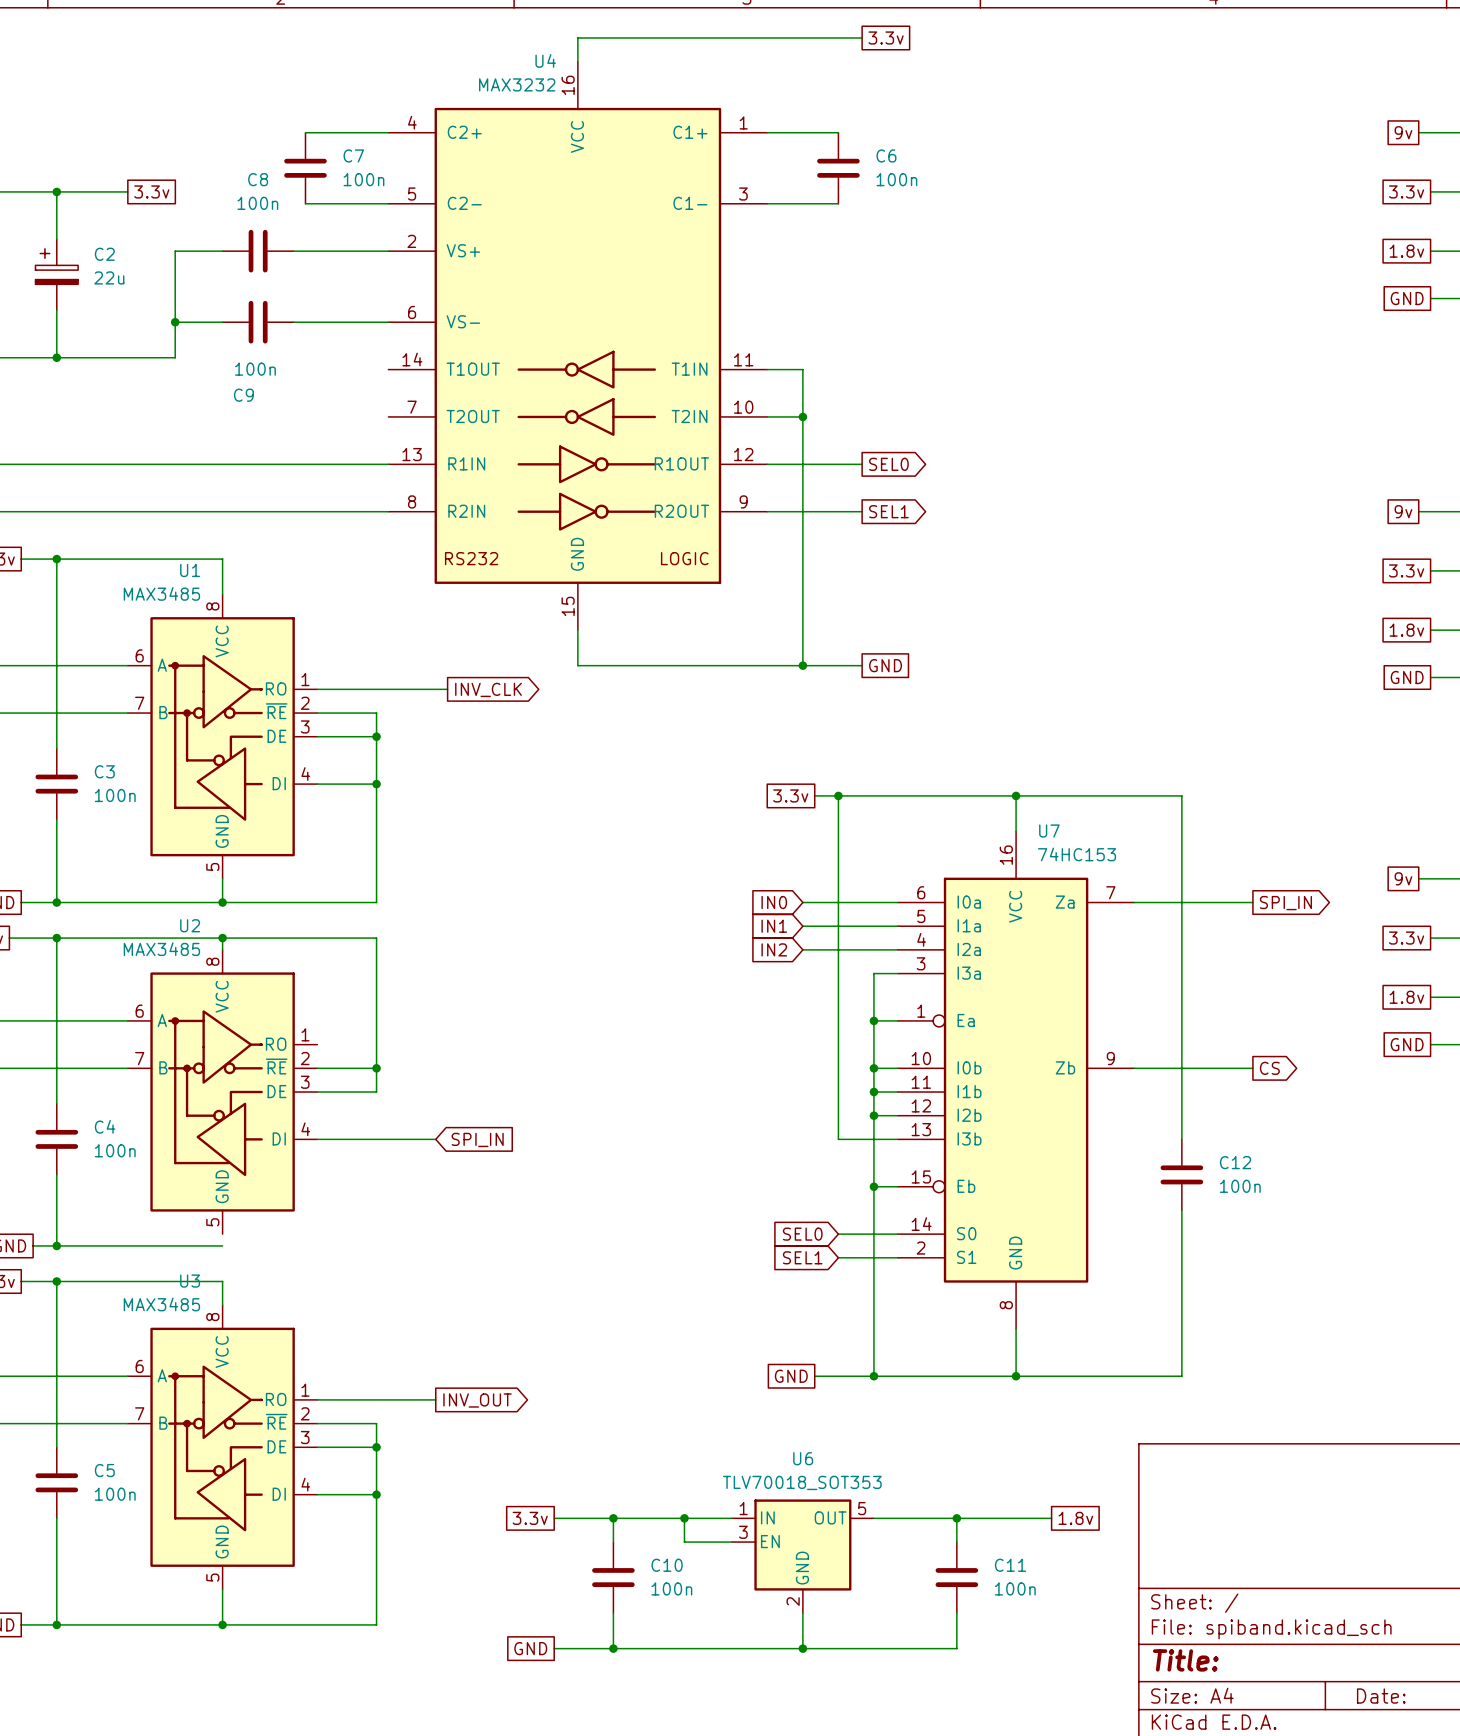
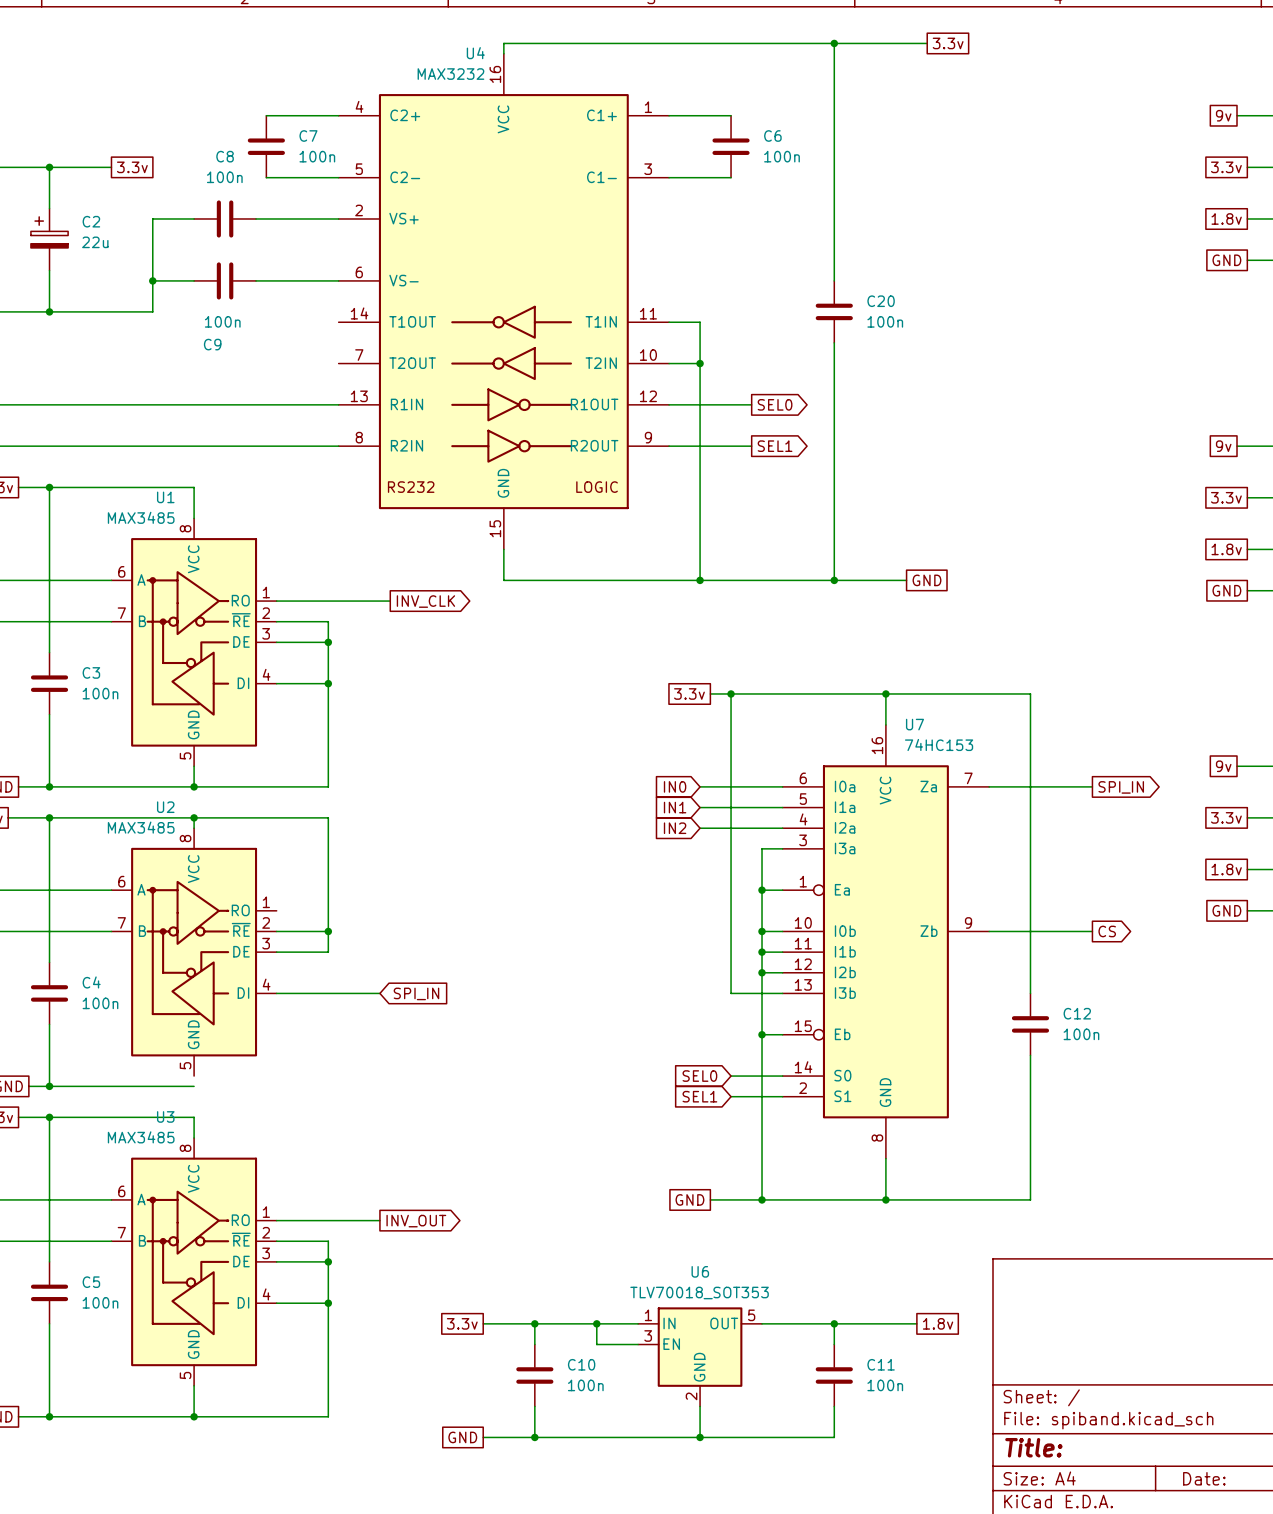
wire: (862, 37) (577, 37) (577, 49) -> (927, 43) (503, 43)
global label position: 3.3v (886, 37) -> 3.3v (948, 43)
wire: none -> (834, 43) (834, 280)
junction: none -> (834, 43)
C20: none -> 100n (834, 311)
wire: none -> (834, 342) (834, 580)
wire: none -> (751, 580) (906, 580)
global label position: GND (885, 665) -> GND (926, 580)
junction: none -> (834, 580)

